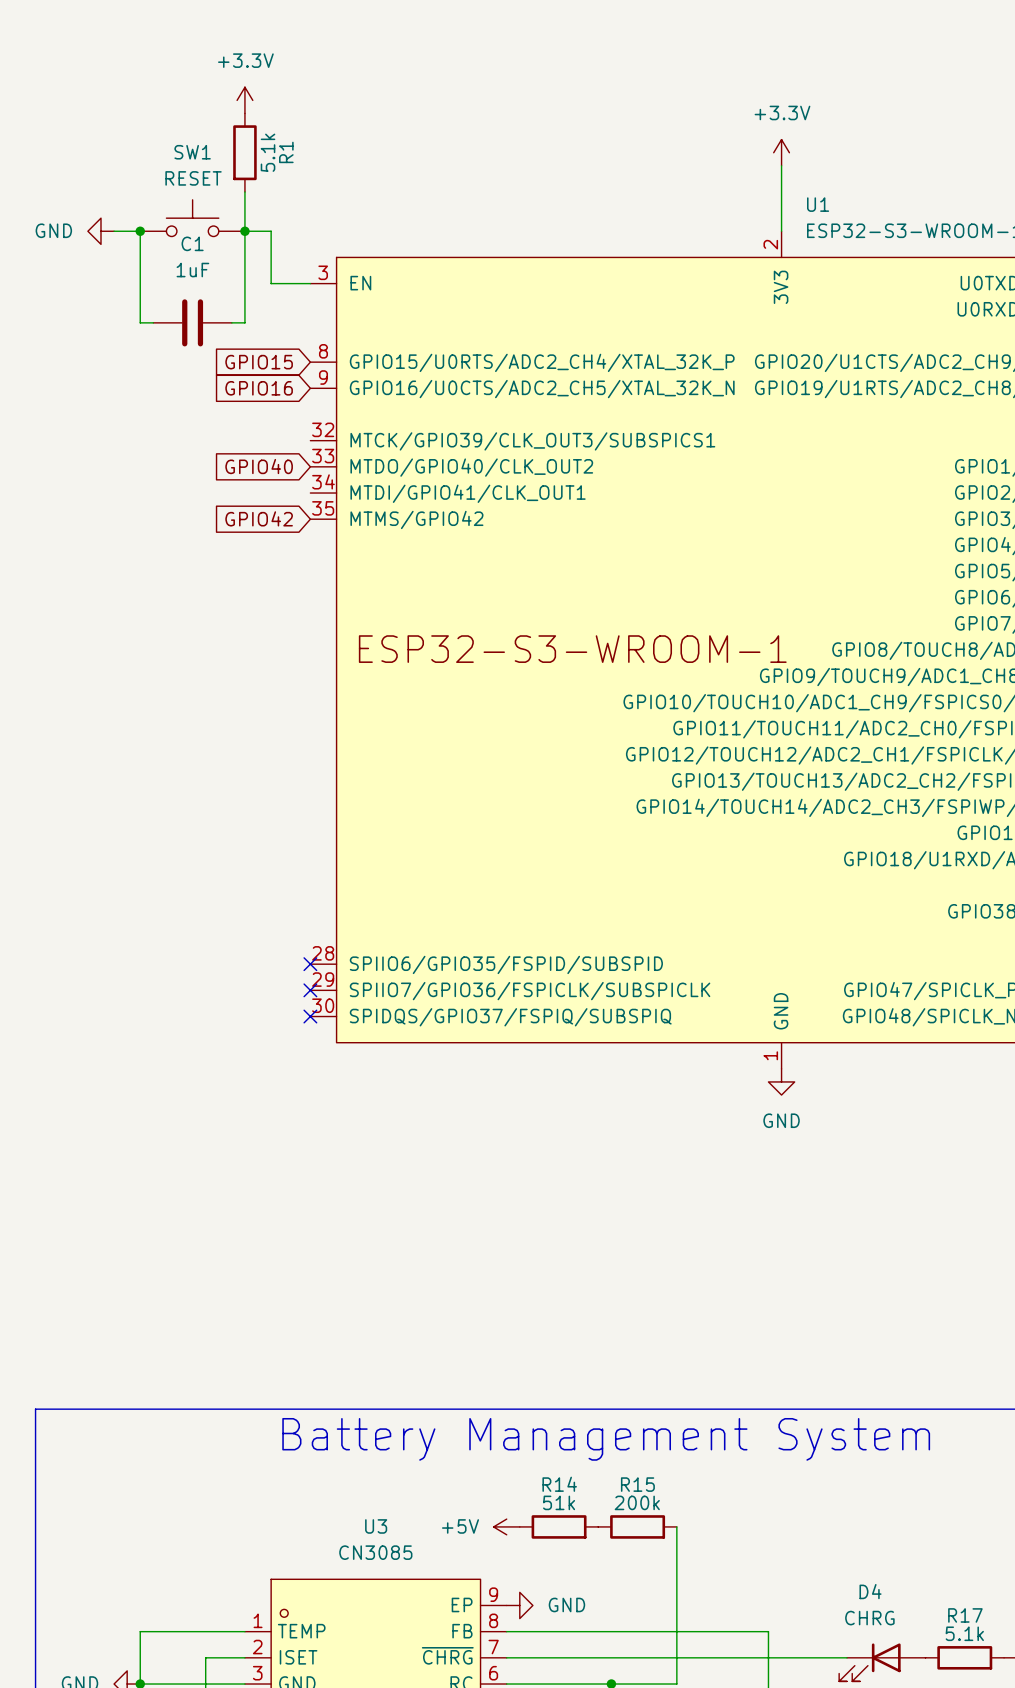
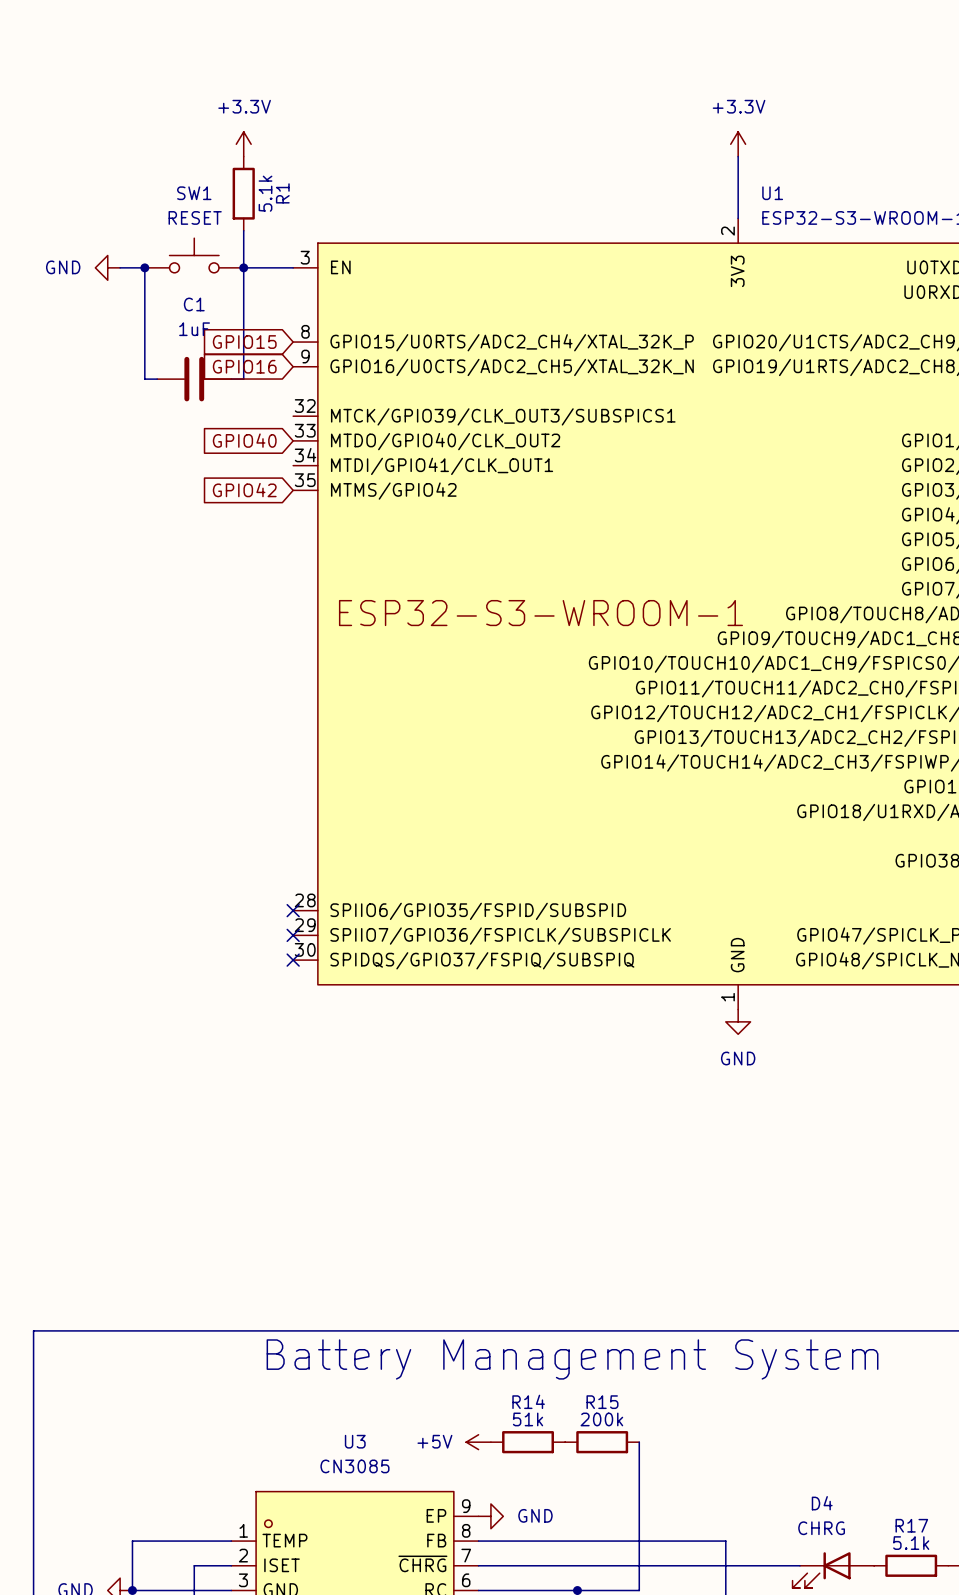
power symbol position: +3.3V (244, 100) -> +3.3V (243, 144)
R1 position: (244, 152) -> (243, 193)
wire: (244, 191) (244, 322) (231, 322) -> none
SW1 position: (192, 218) -> (194, 255)
power symbol position: GND (100, 231) -> GND (107, 267)
wire: (114, 231) (140, 231) (140, 322) (153, 322) -> none
junction: (140, 231) -> none
wire: (244, 231) (271, 231) (271, 283) -> (243, 267) (256, 267)
junction: (244, 231) -> none
wire: none -> (243, 230) (243, 379) (231, 379)
wire: none -> (120, 267) (144, 267) (144, 379) (157, 379)
junction: none -> (144, 267)
junction: none -> (243, 267)
C1 position: (192, 322) -> (194, 379)

